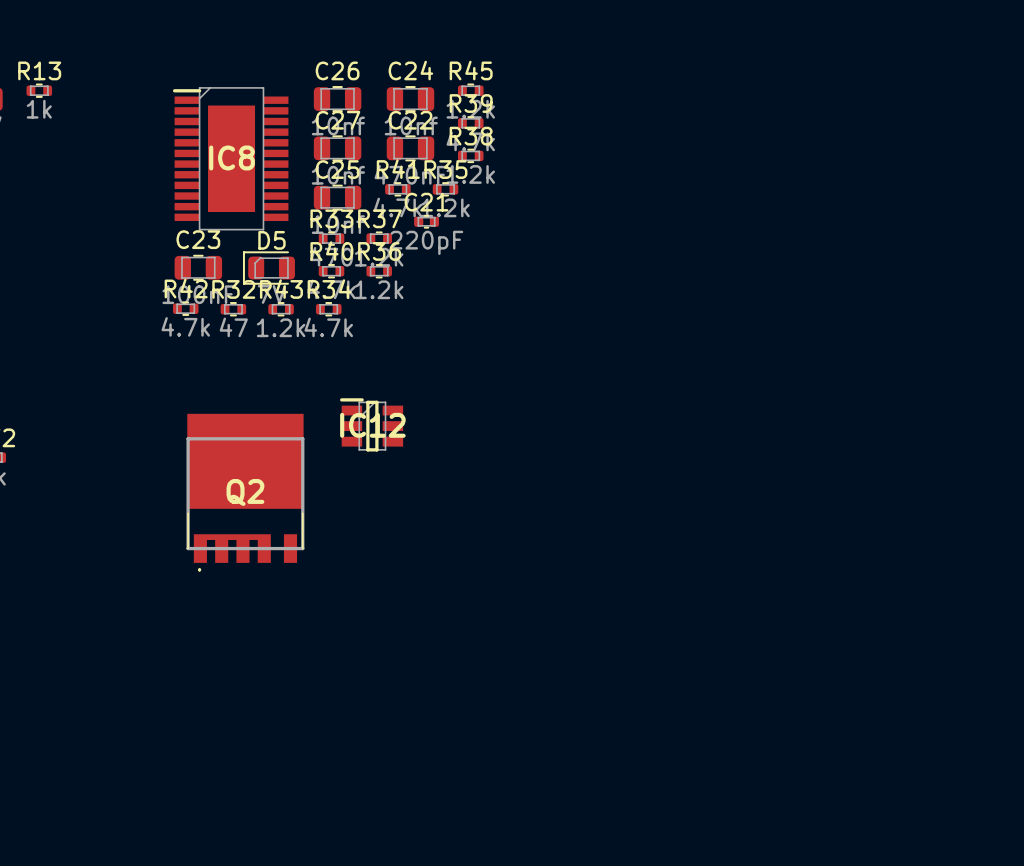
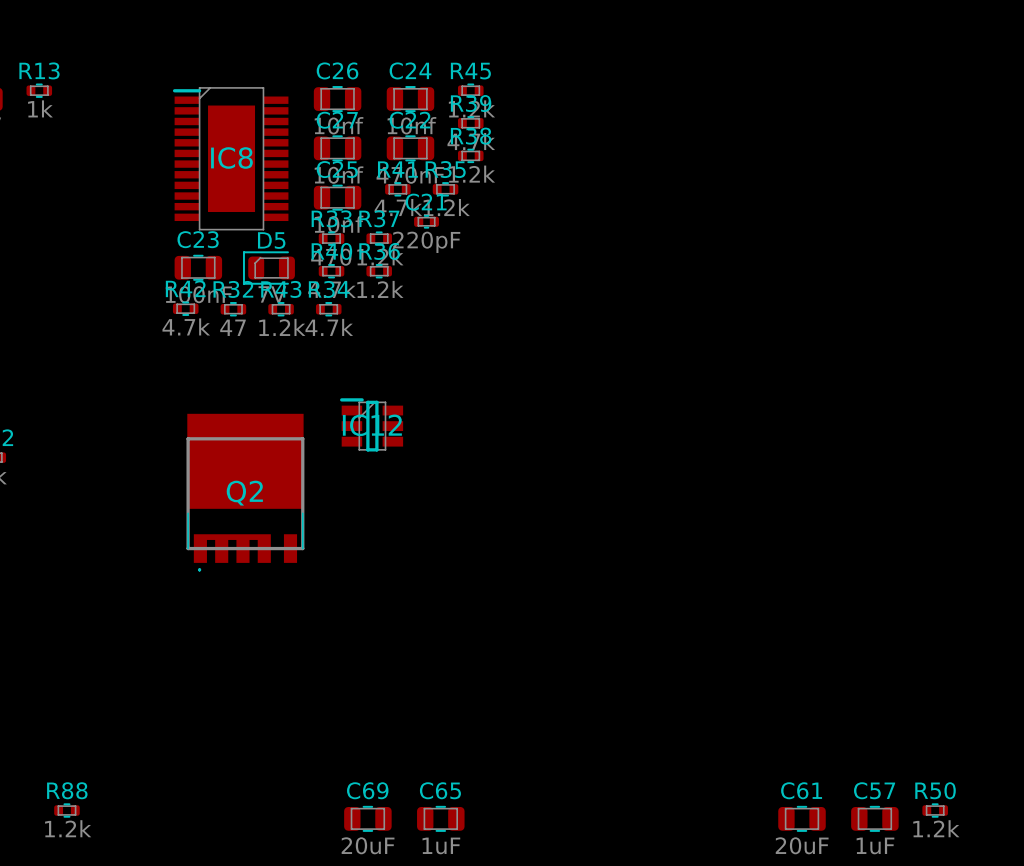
R88: none -> 1.2k (66, 810)
R50: none -> 1.2k (935, 810)
C69: none -> 20uF (367, 818)
C65: none -> 1uF (440, 818)
C61: none -> 20uF (801, 818)
C57: none -> 1uF (874, 818)

